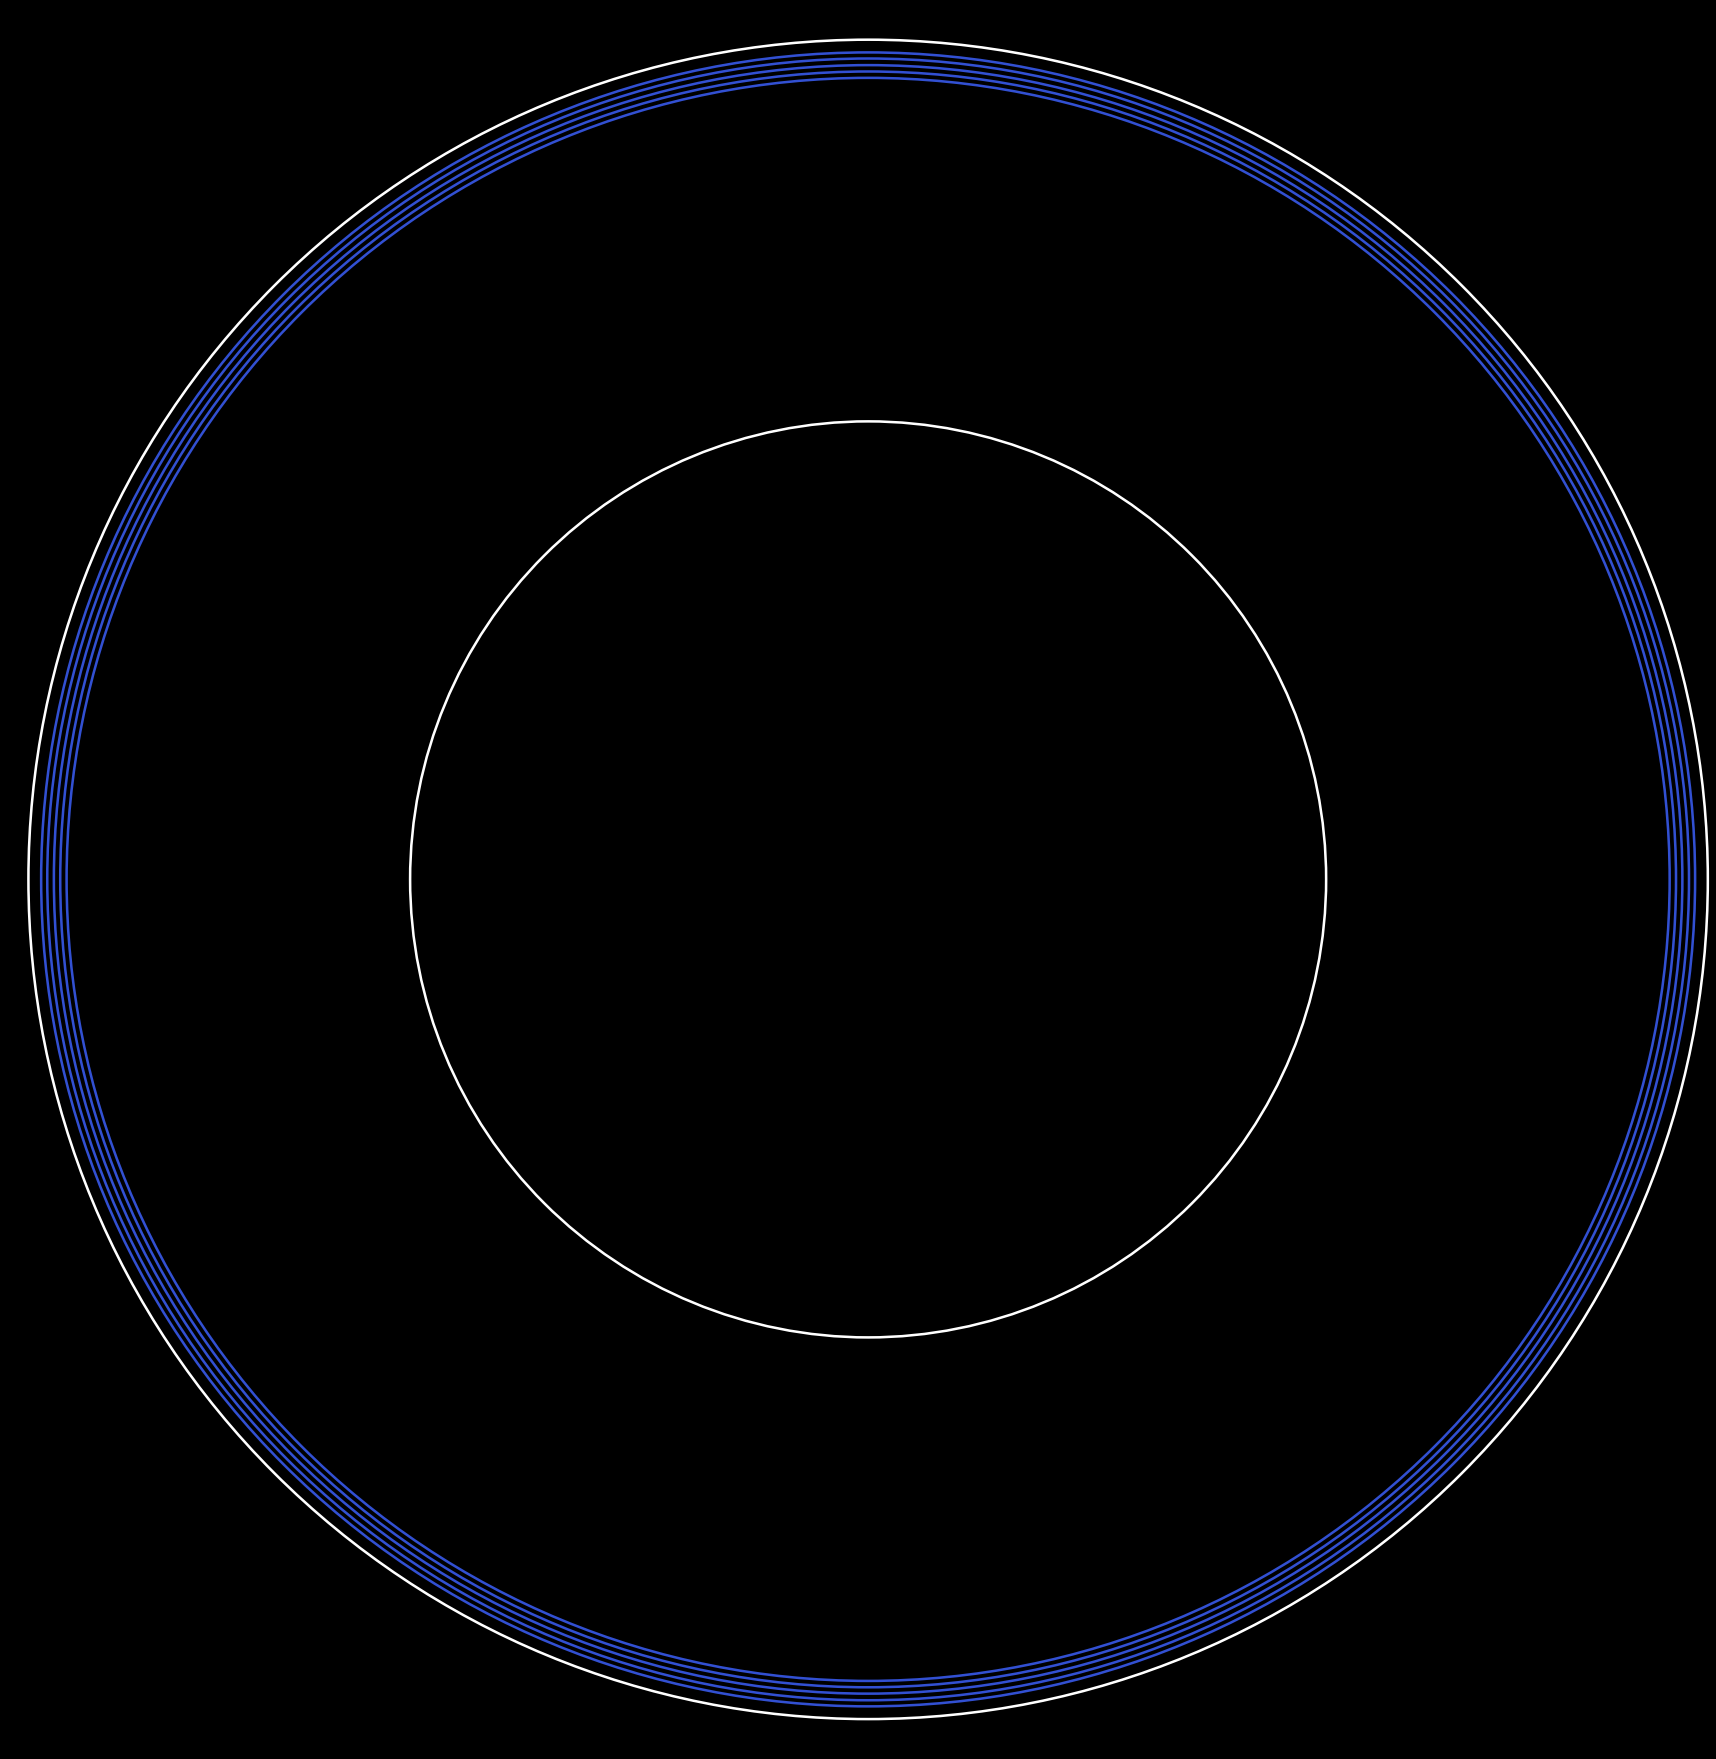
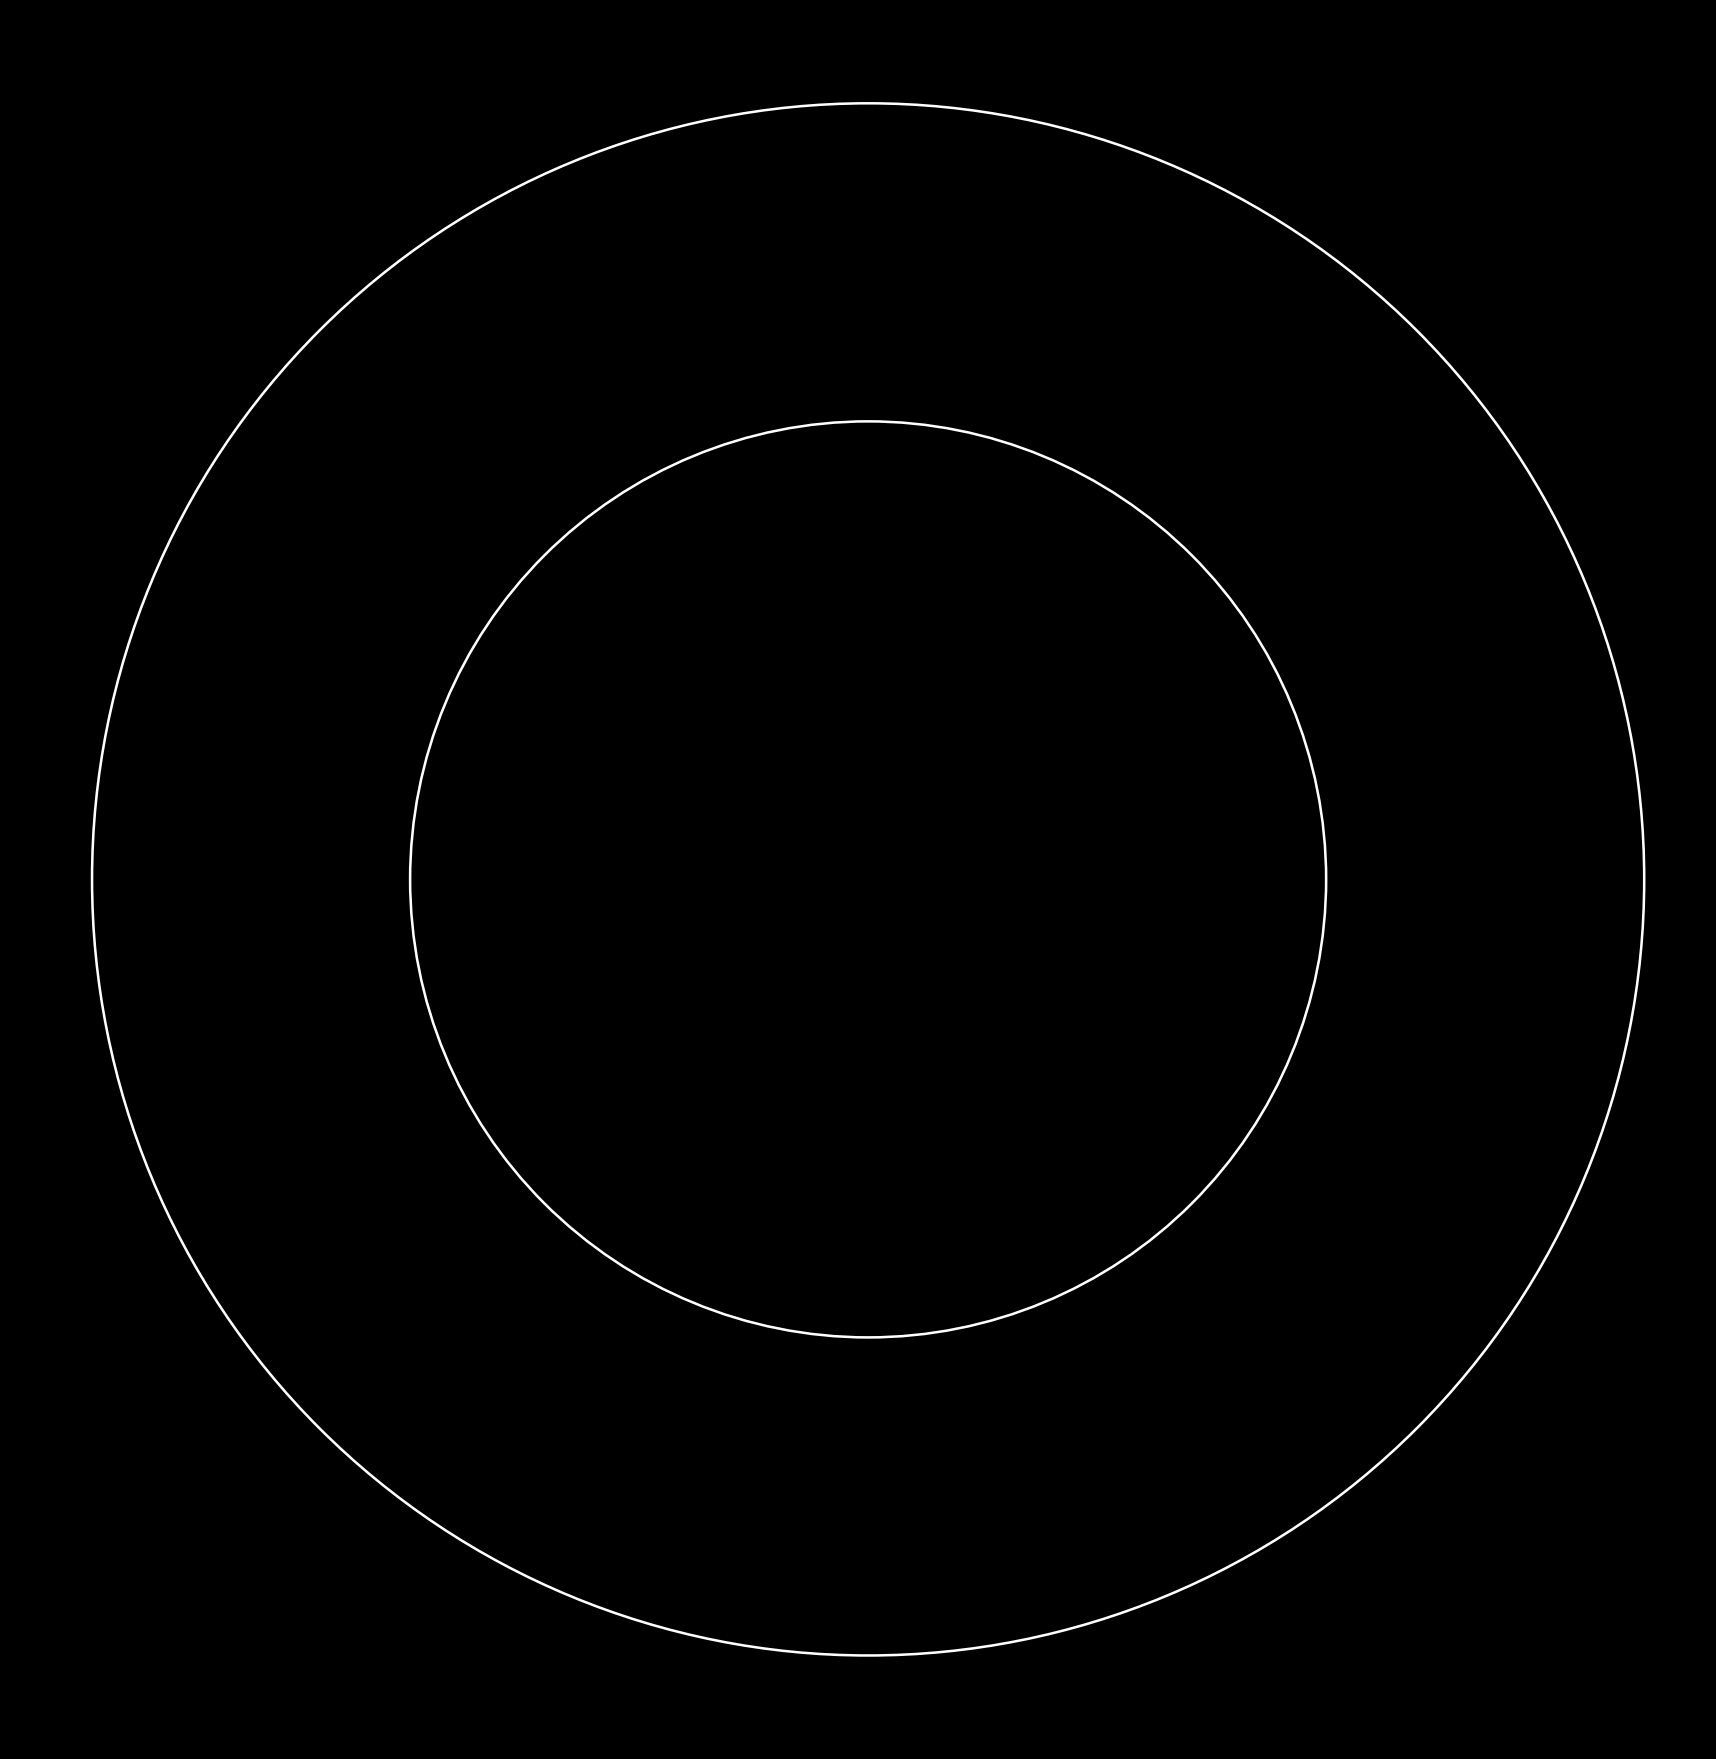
round board edge size: [27, 38, 1710, 1721] -> [90, 102, 1646, 1657]
drawing: [39, 51, 1697, 1708] -> none

